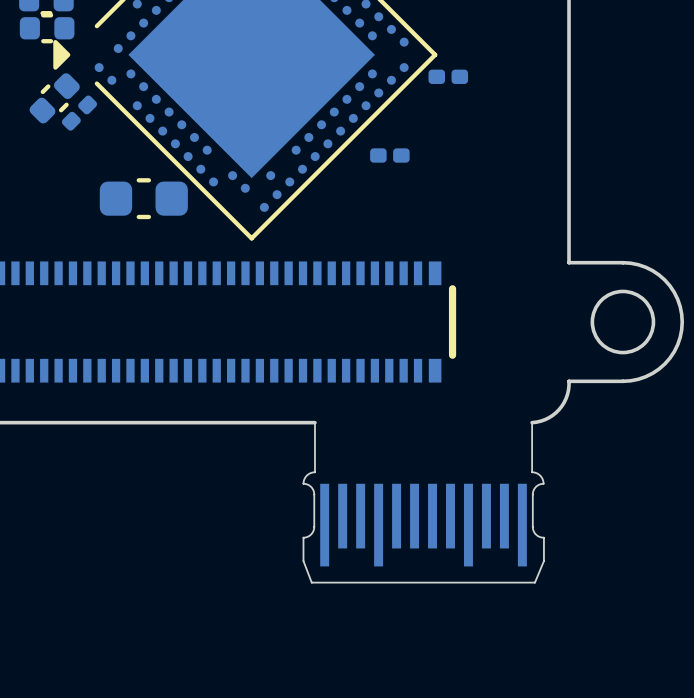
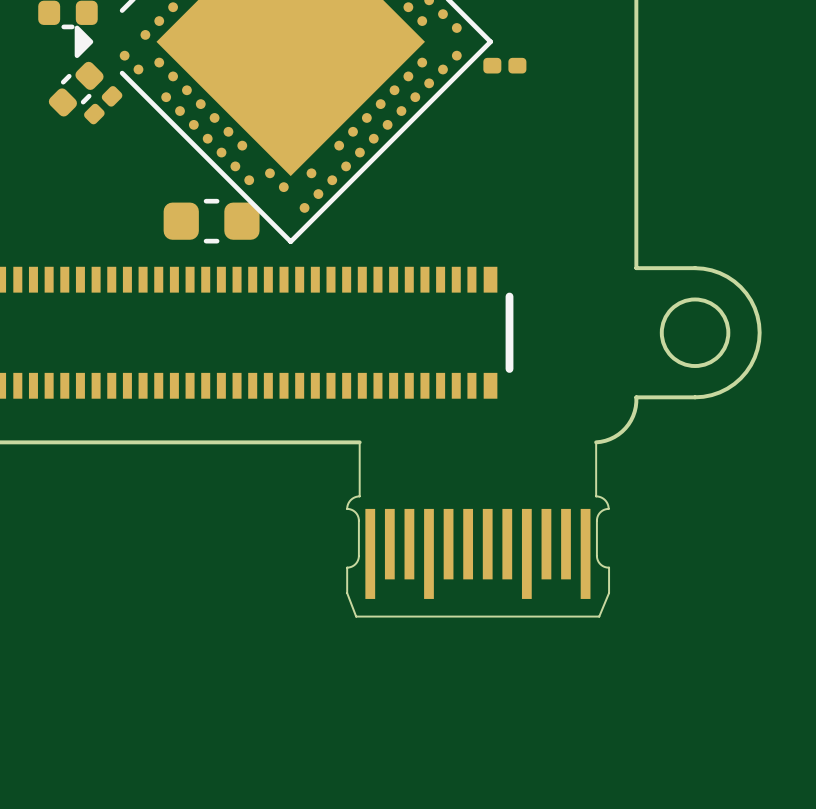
part: (389, 155) -> none
part position: (143, 198) -> (211, 221)

